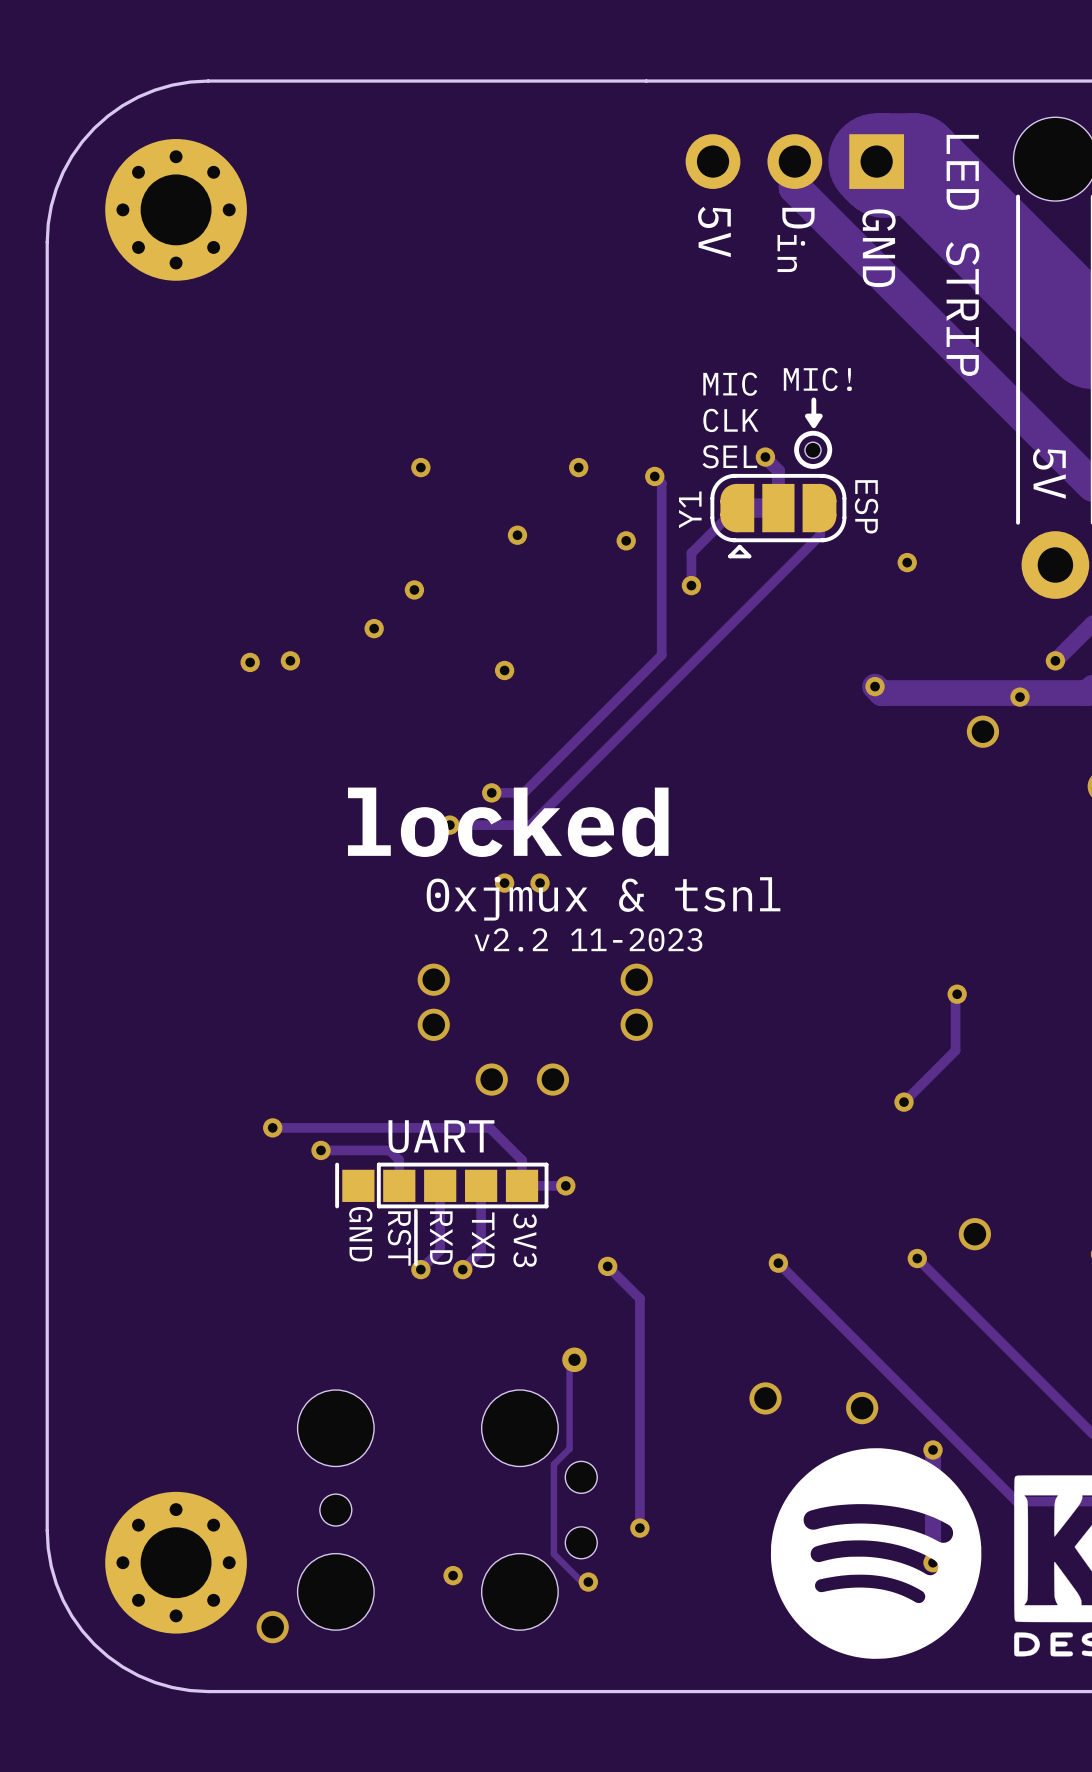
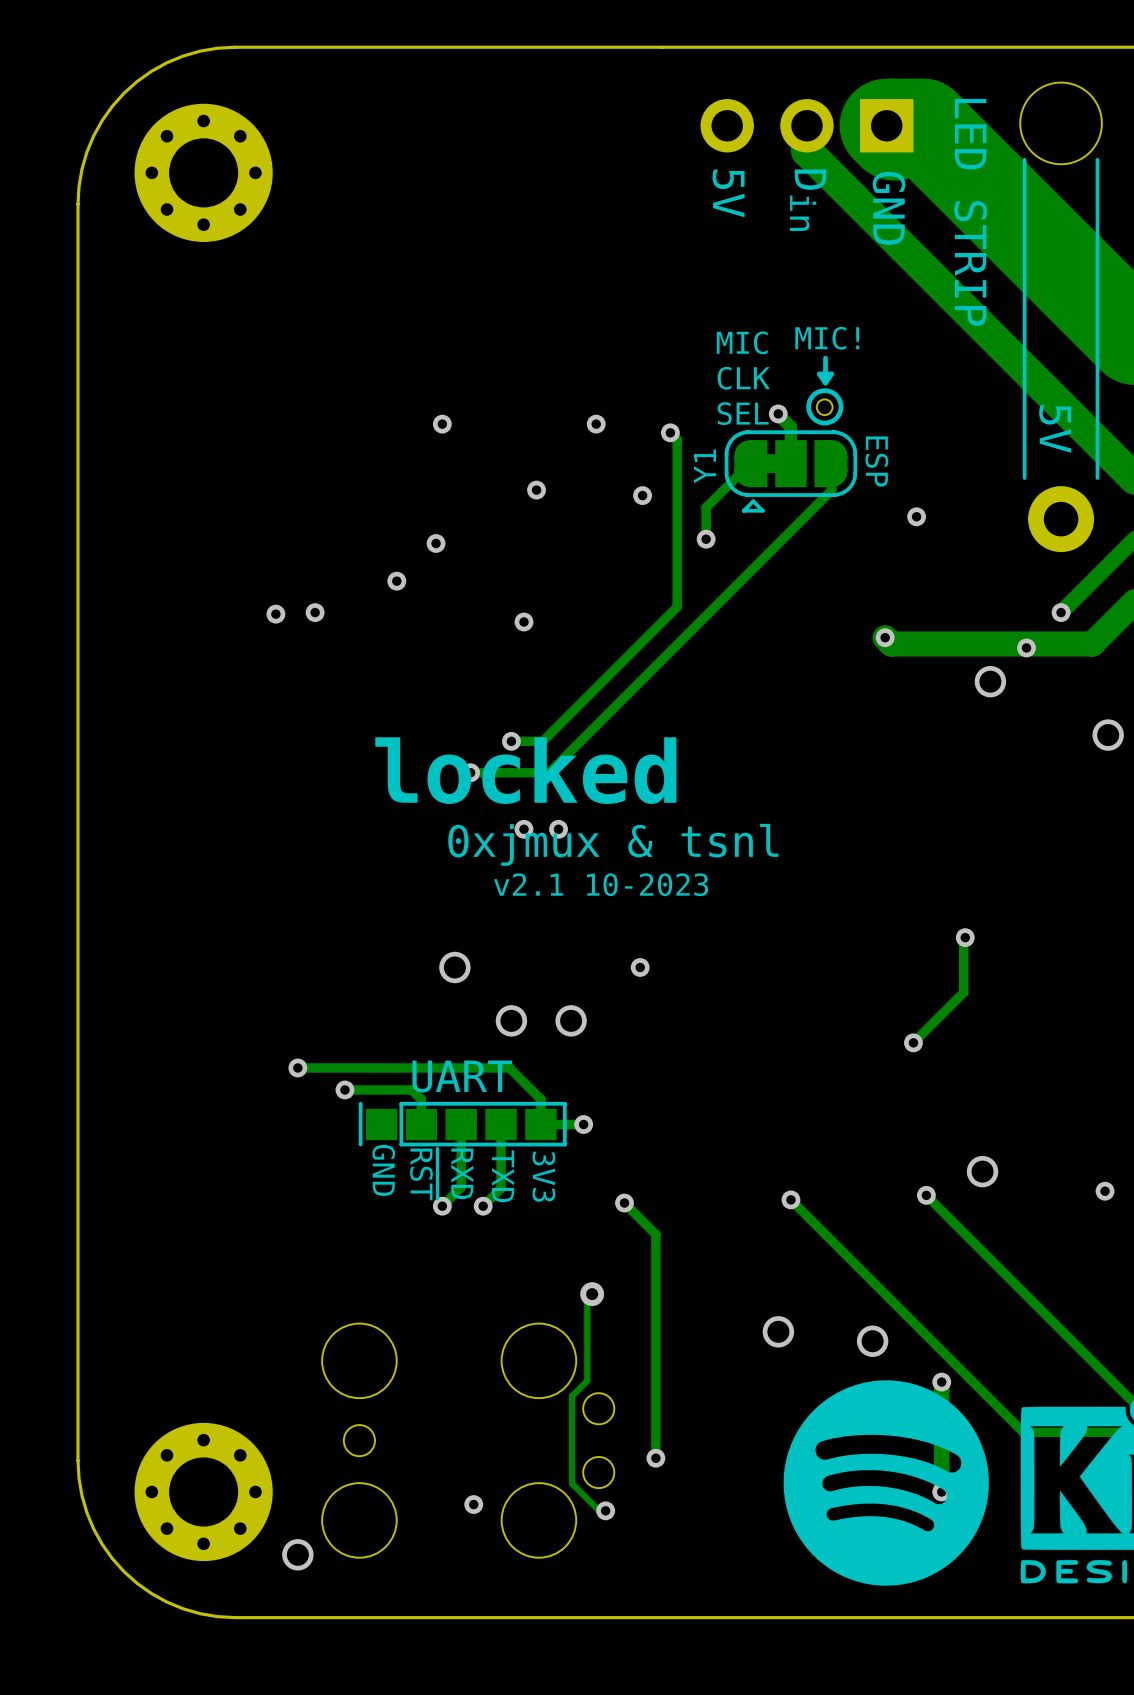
text: v2.2 11-2023 (588, 939) -> v2.1 10-2023 (601, 884)
via: (433, 979) -> none
via: (636, 979) -> none
via size: [620, 1008, 653, 1041] -> [630, 958, 650, 977]

